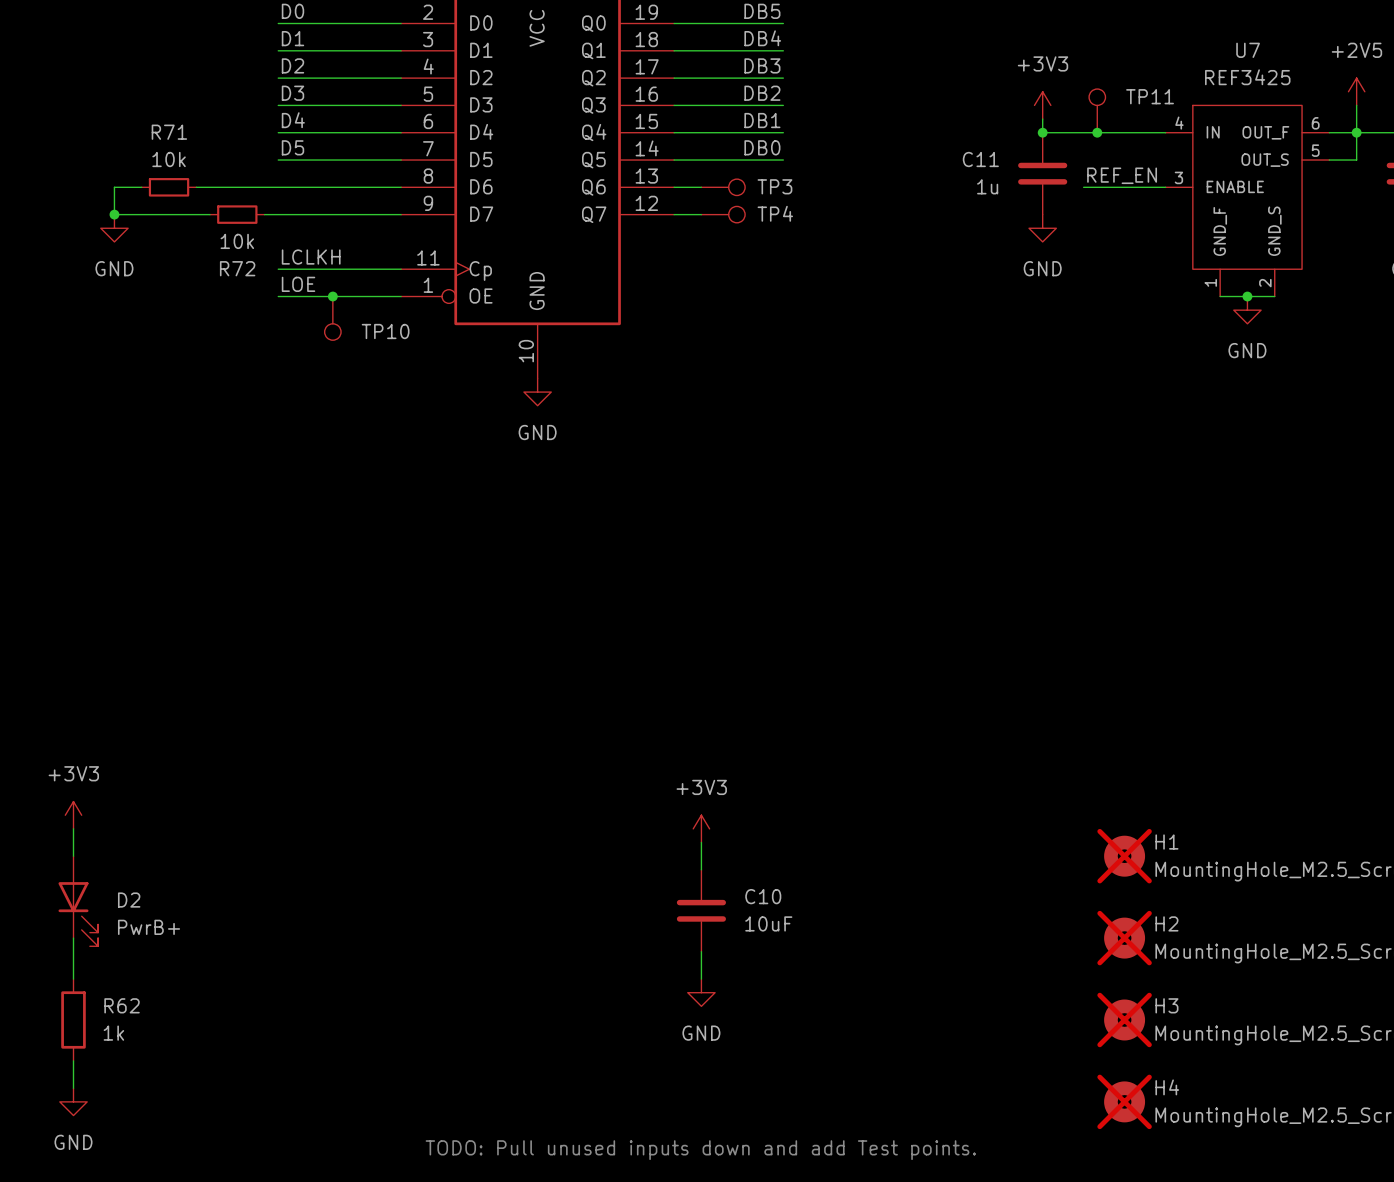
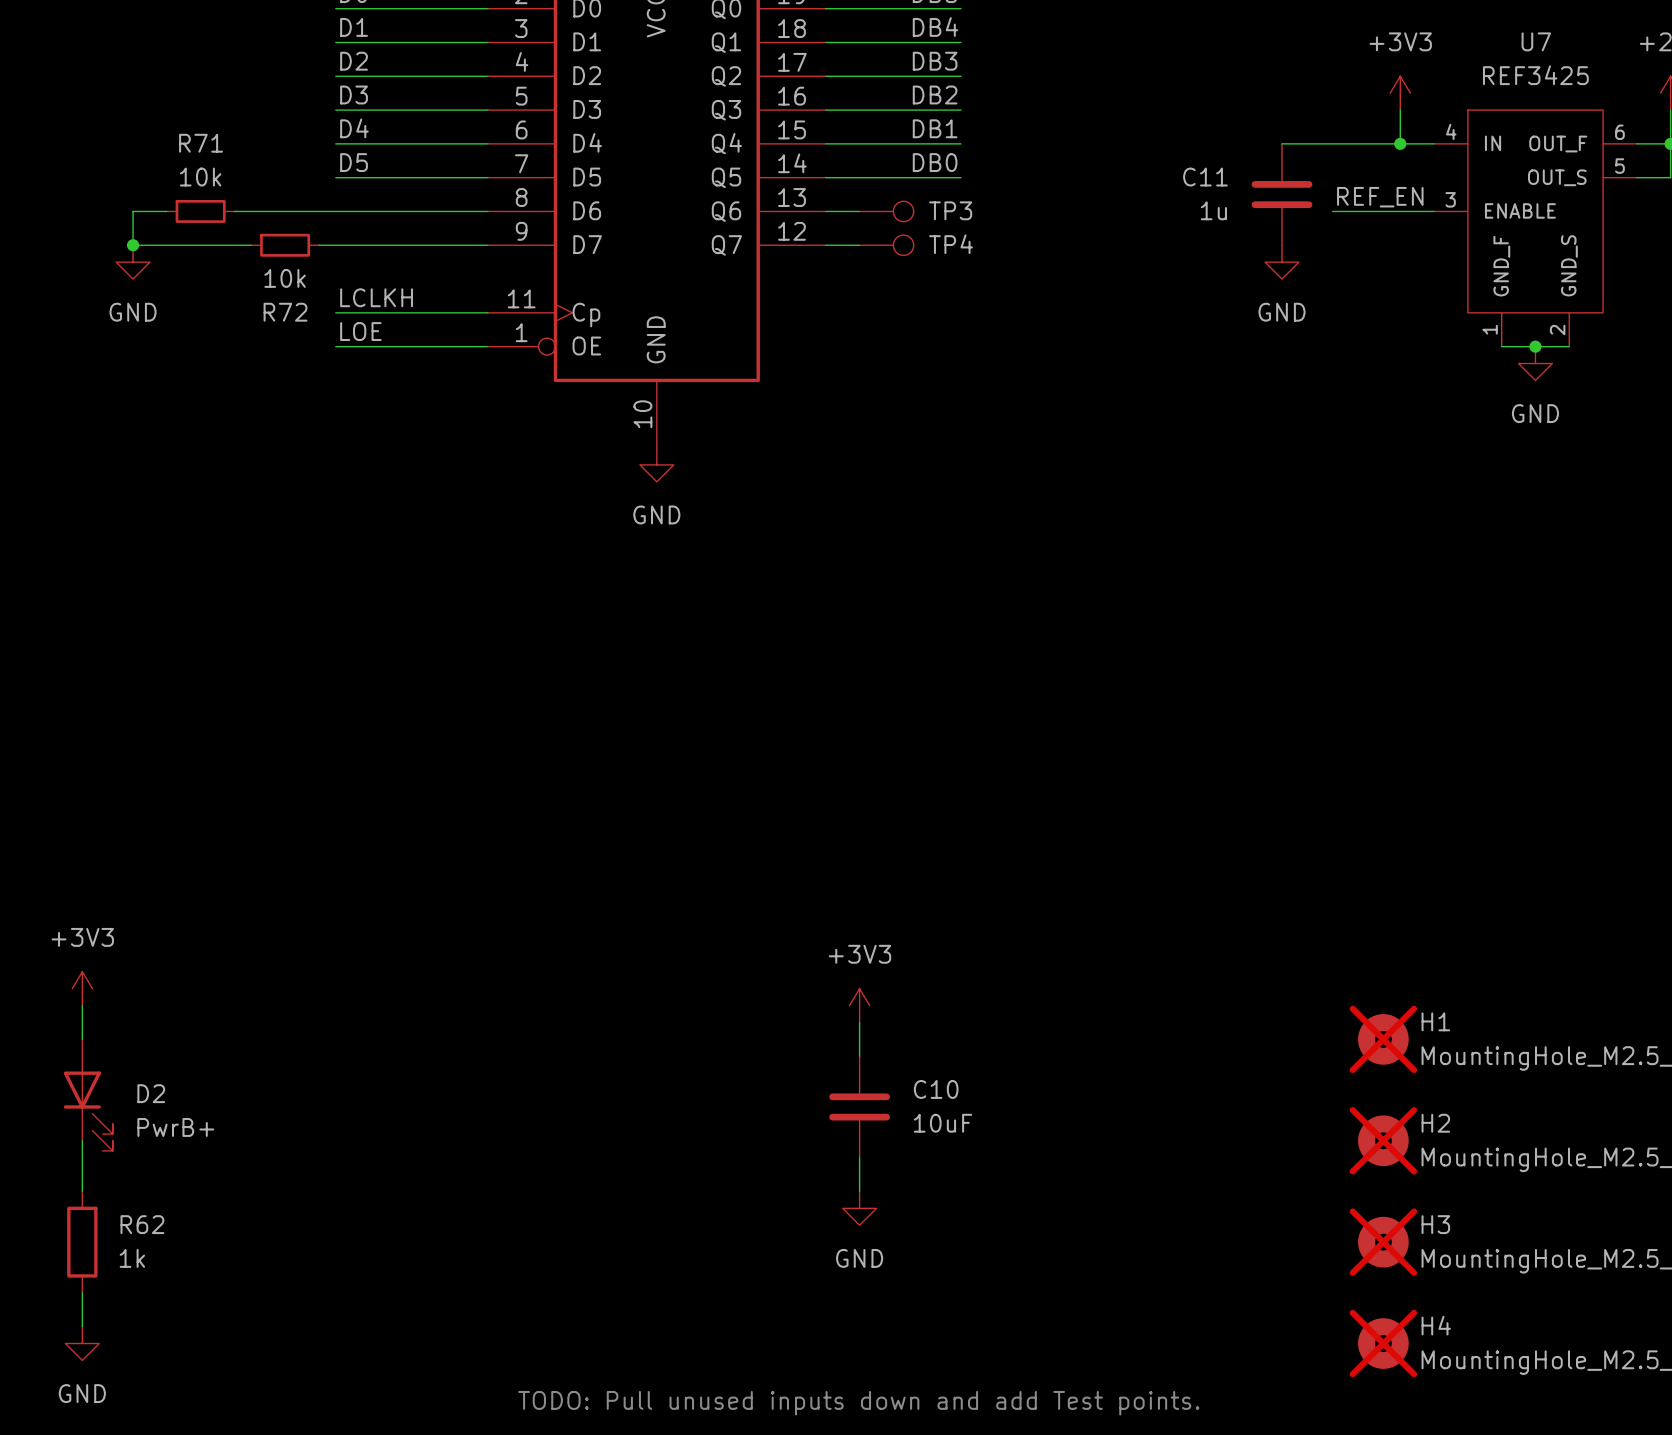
power symbol position: +3V3 (1042, 105) -> +3V3 (1400, 93)
wire: none -> (1400, 110) (1400, 143)
TP11: (1097, 110) -> none
wire: (1042, 119) (1042, 132) -> none
junction: (1042, 132) -> none
junction position: (1097, 132) -> (1400, 143)
junction: (332, 296) -> none
TP10: (332, 318) -> none

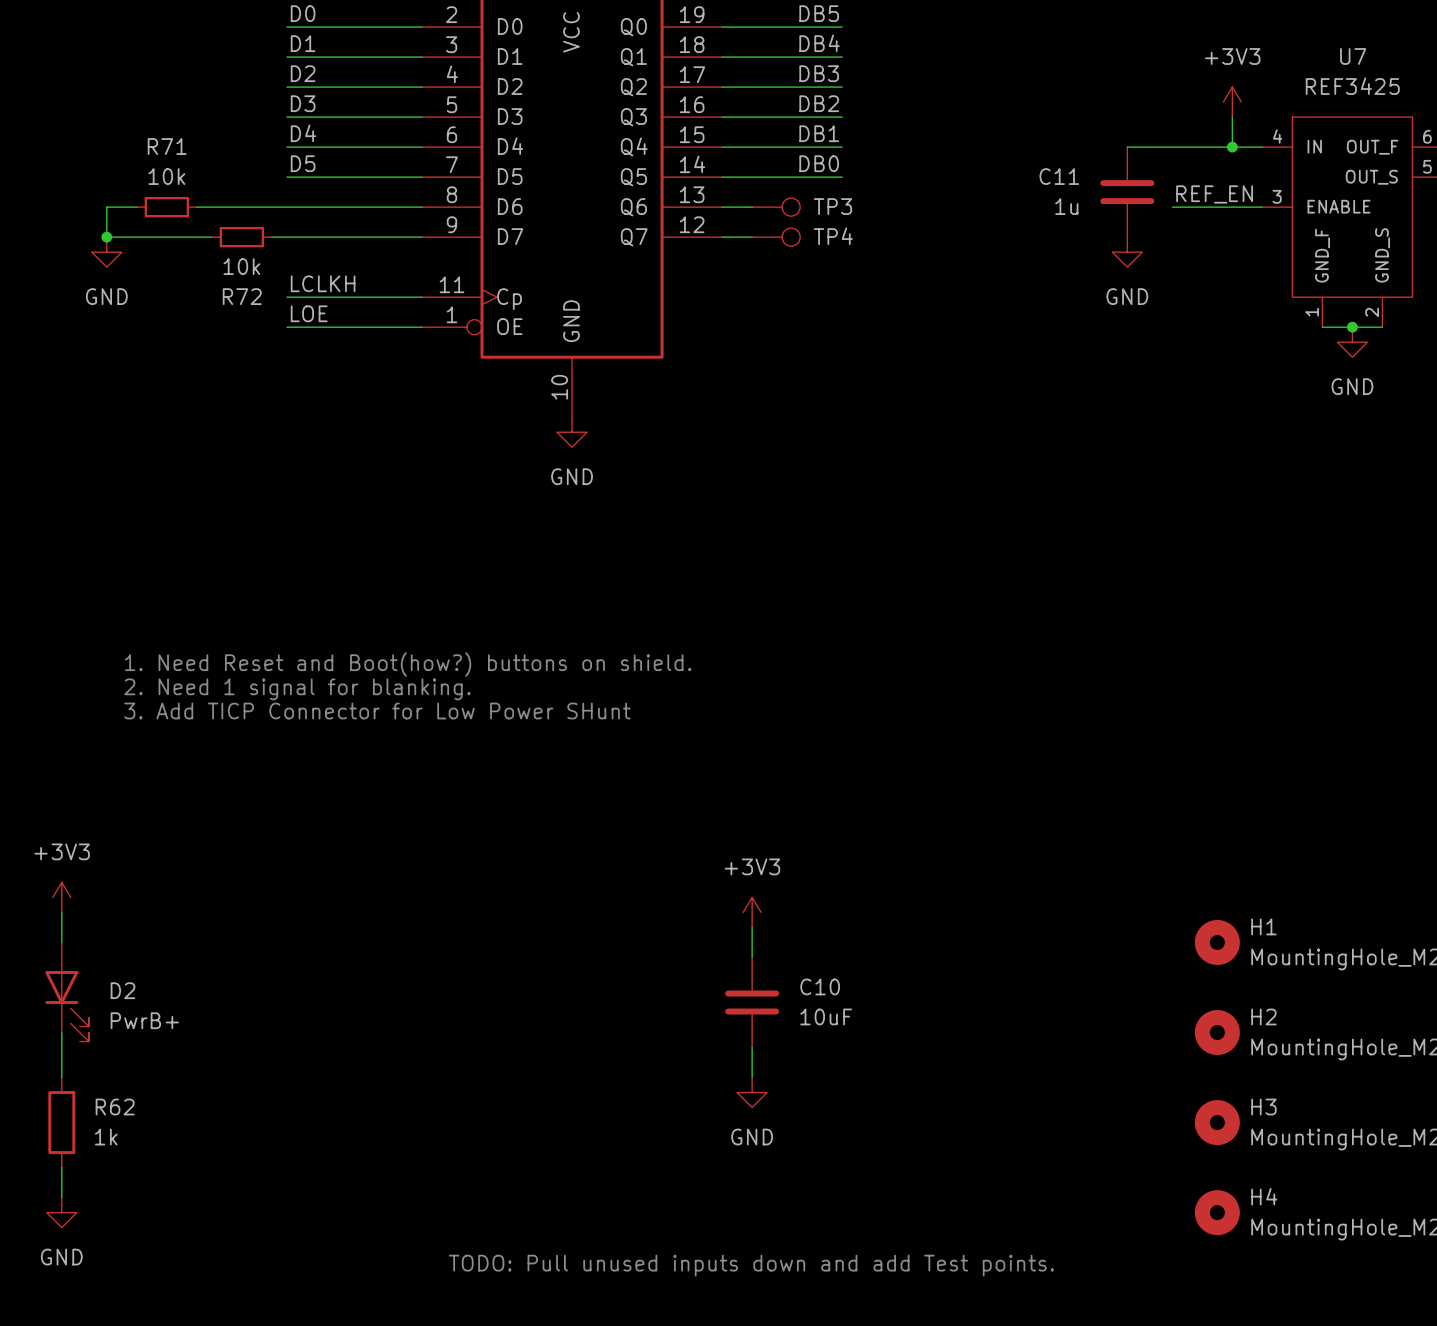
text: none -> 1. Need Reset and Boot(how?) buttons on shield. (408, 664)
text: none -> 2. Need 1 signal for blanking. (297, 689)
text: none -> 3. Add TICP Connector for Low Power SHunt (377, 711)
H1 do-not-place cross: (1383, 1039) -> none
H2 do-not-place cross: (1383, 1140) -> none
H3 do-not-place cross: (1383, 1242) -> none
H4 do-not-place cross: (1383, 1343) -> none

